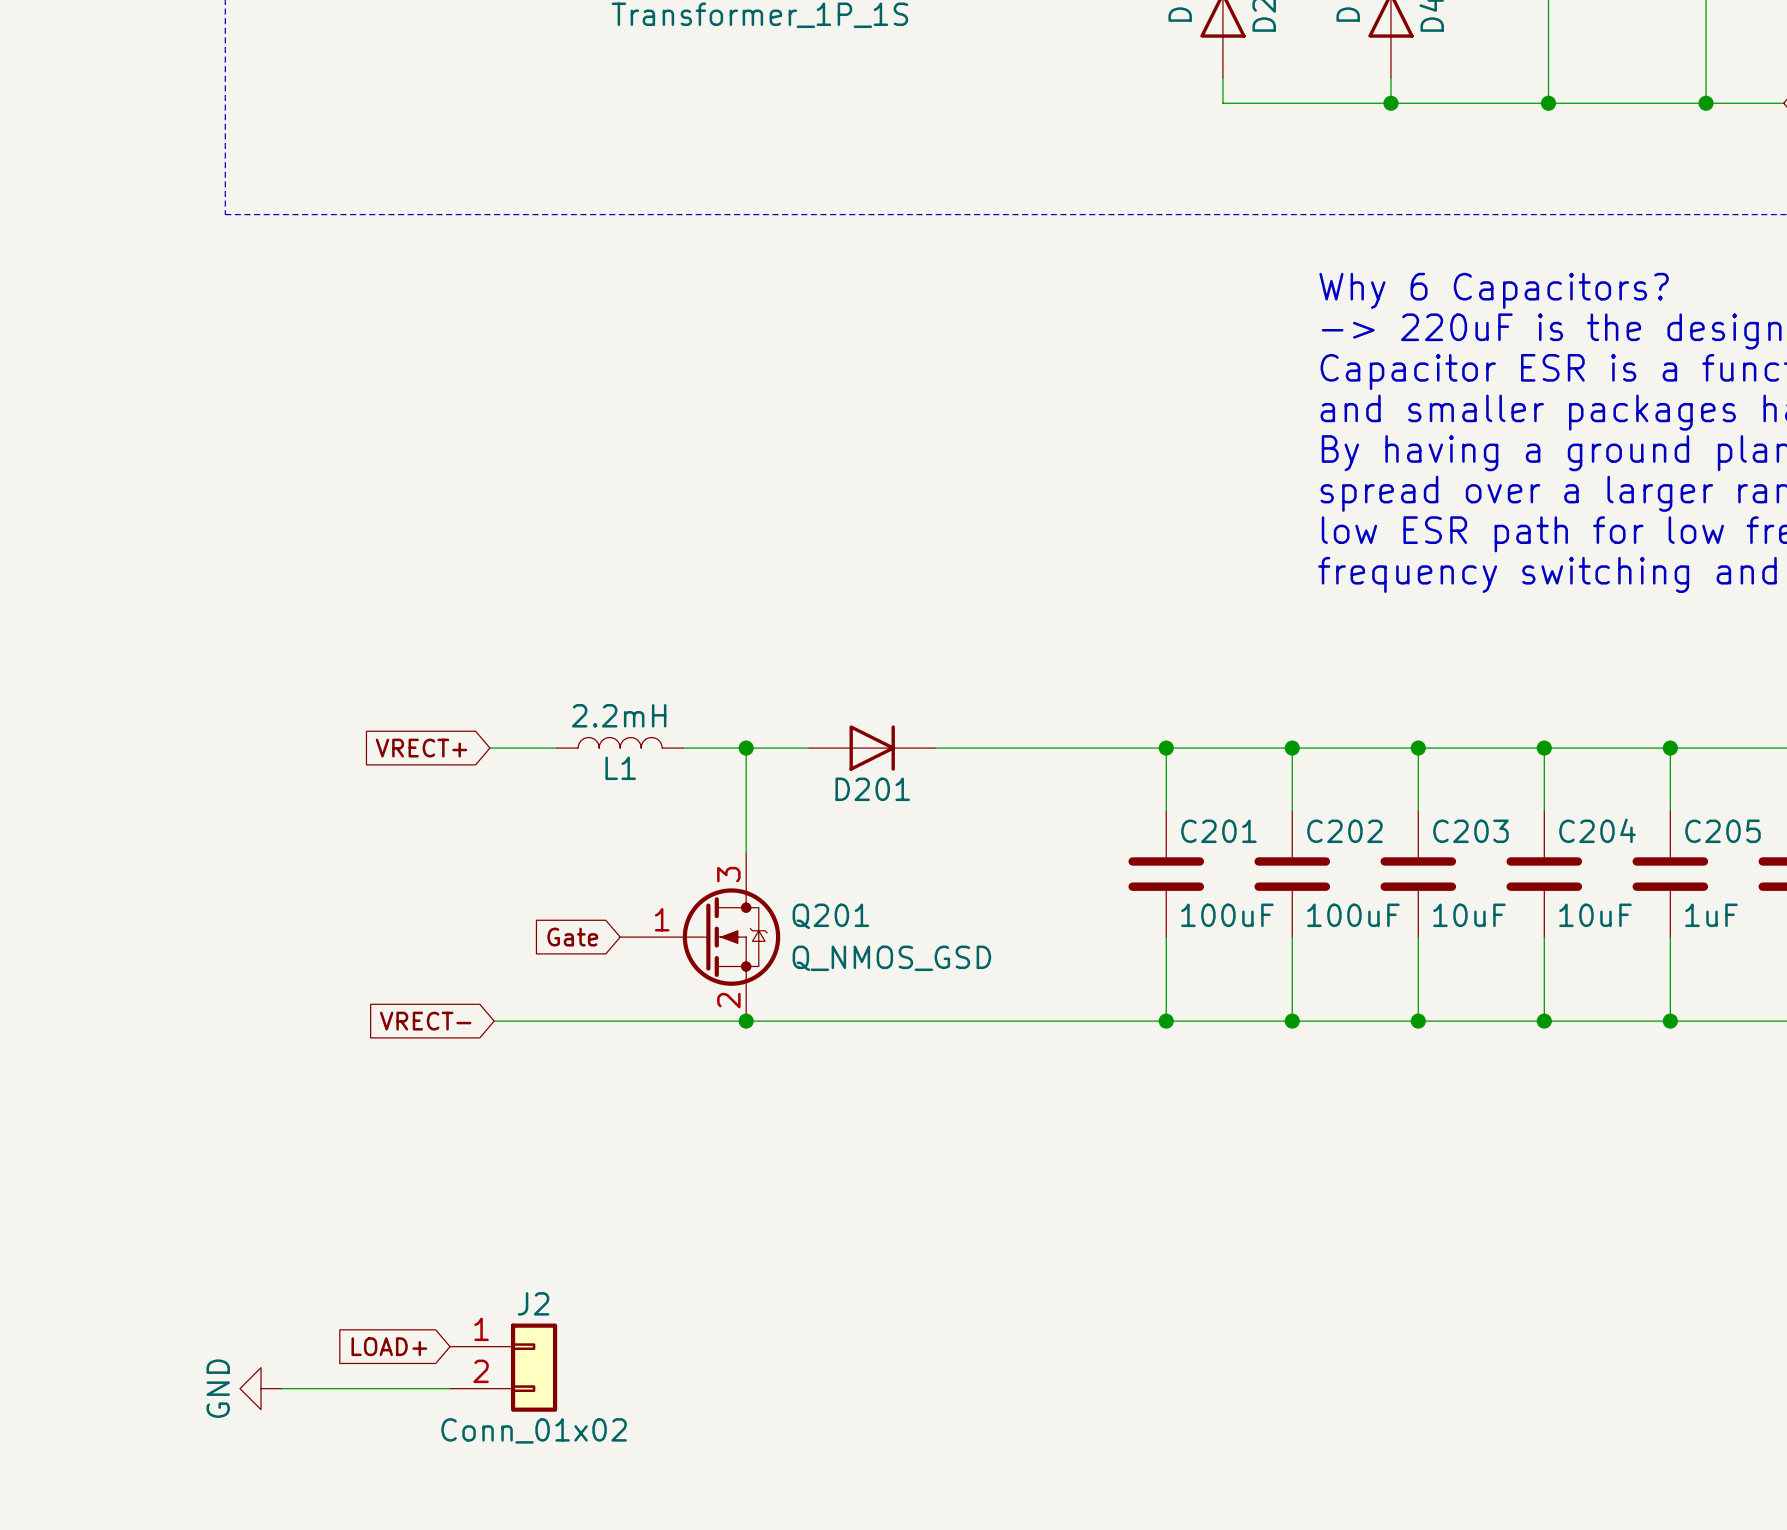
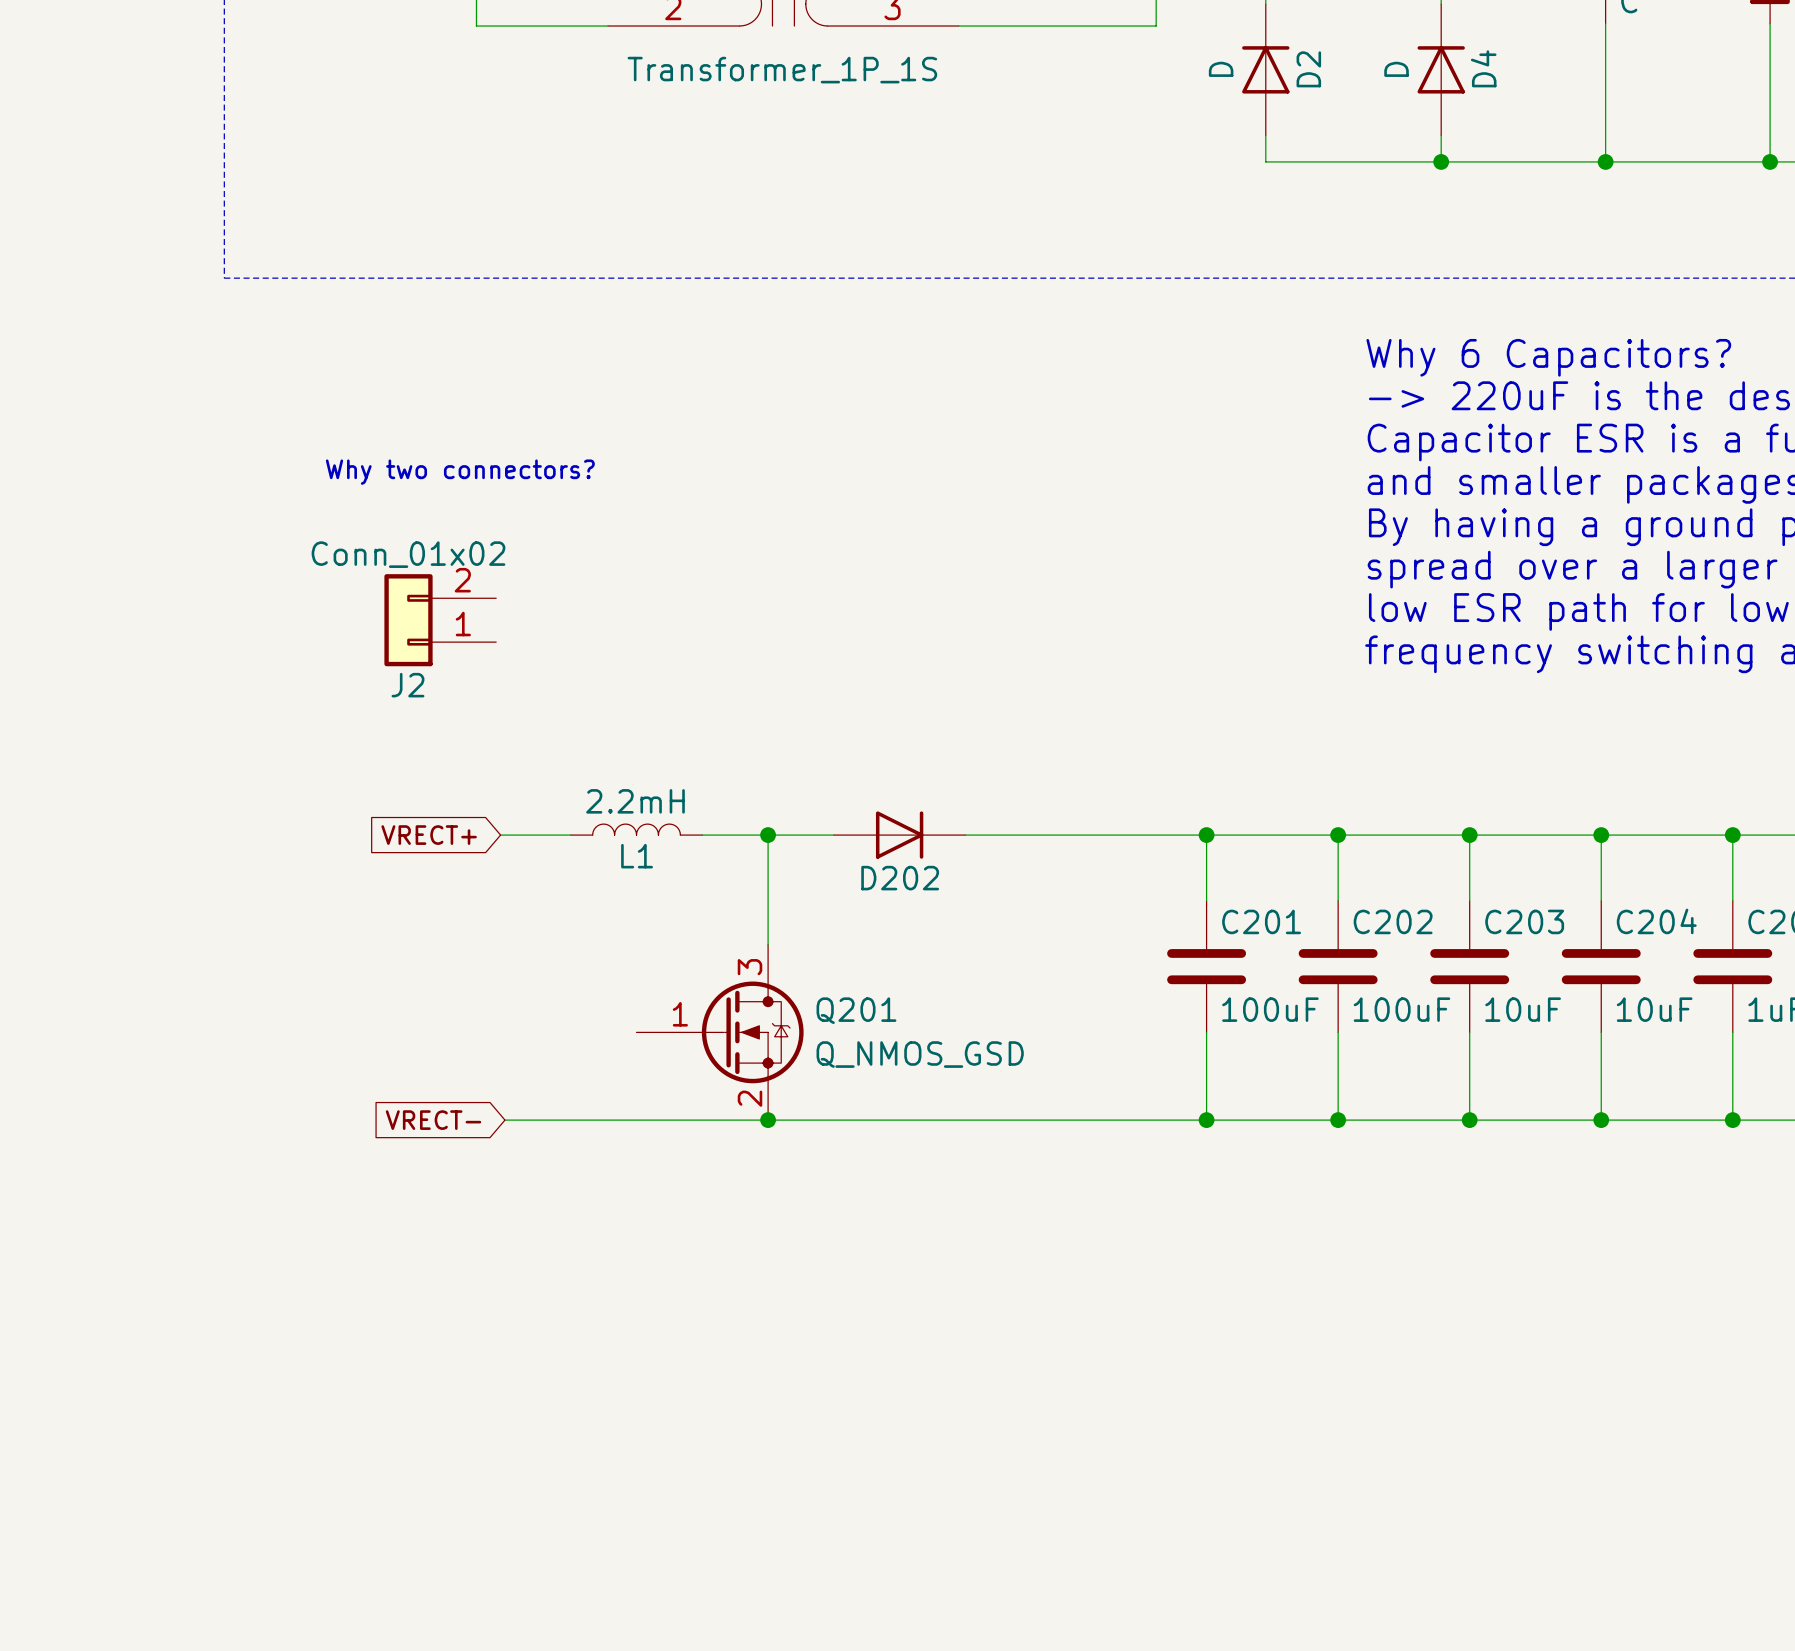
text: none -> Why two connectors? (460, 472)
D201 name: D201 (872, 789) -> D202 (900, 878)
global label: Gate (572, 937) -> none
global label: LOAD+ (389, 1346) -> none
J2 position: (503, 1367) -> (440, 620)
J2 rotation: 0° (534, 1367) -> 180° (408, 620)
power symbol: GND (261, 1388) -> none
wire: (282, 1388) (450, 1388) -> none

